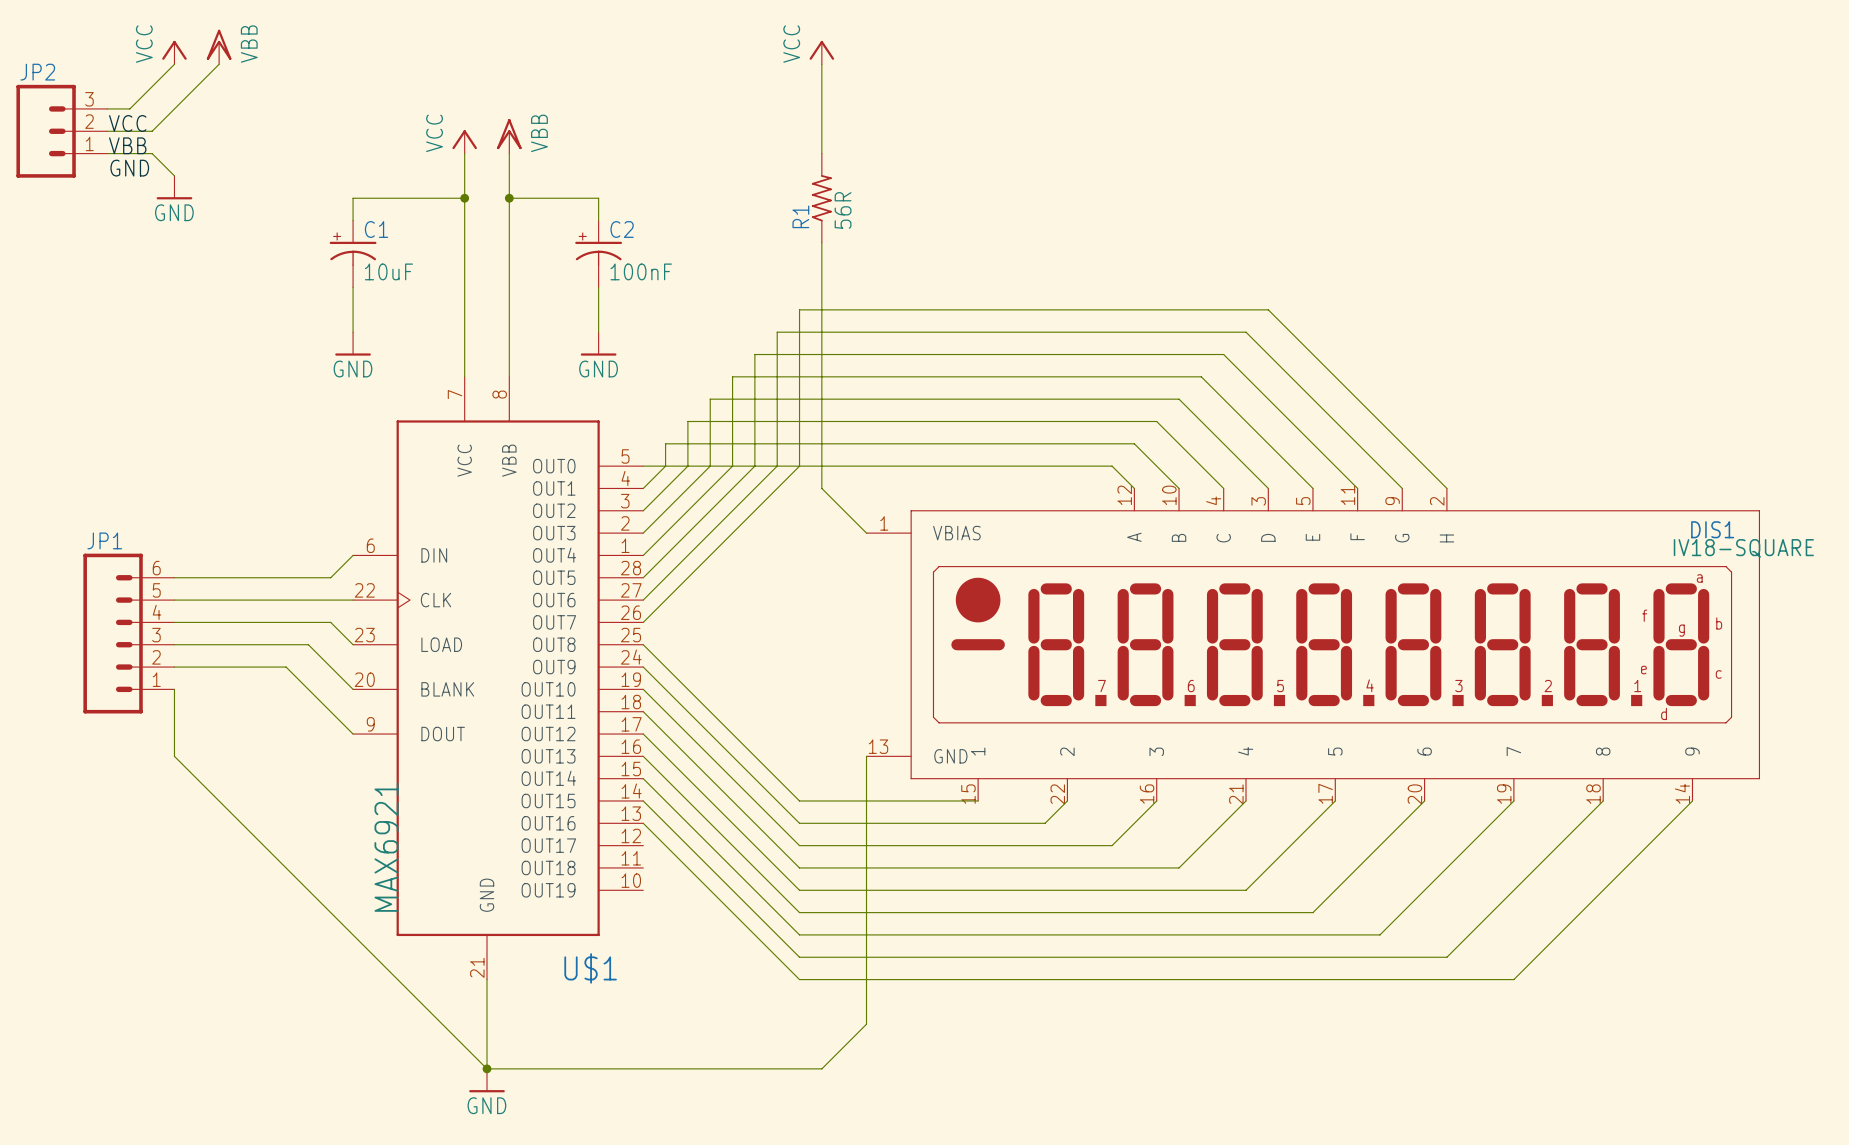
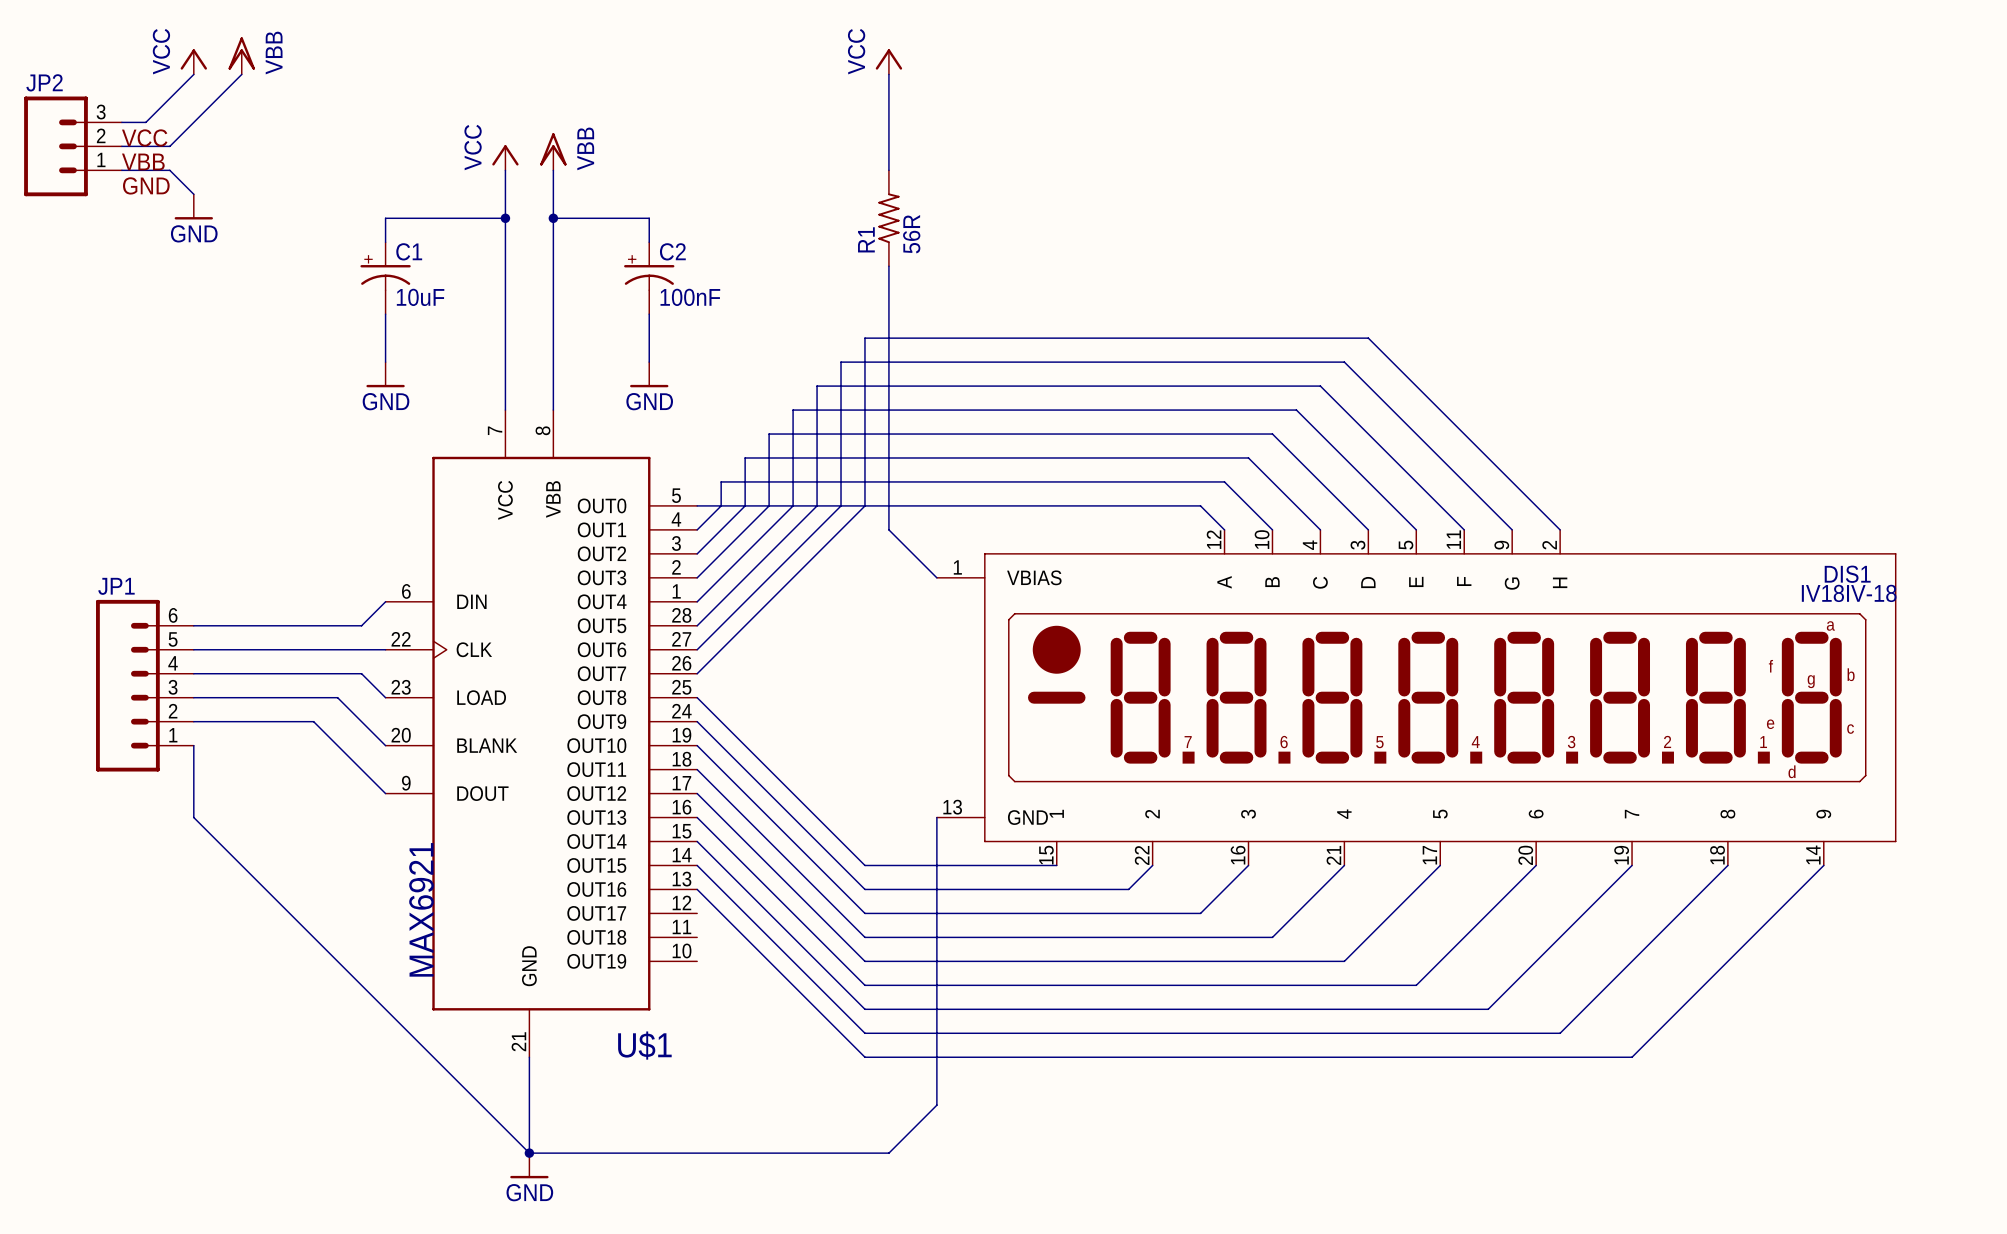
DIS1 value: IV18-SQUARE (1743, 548) -> IV18IV-18 (1849, 593)

